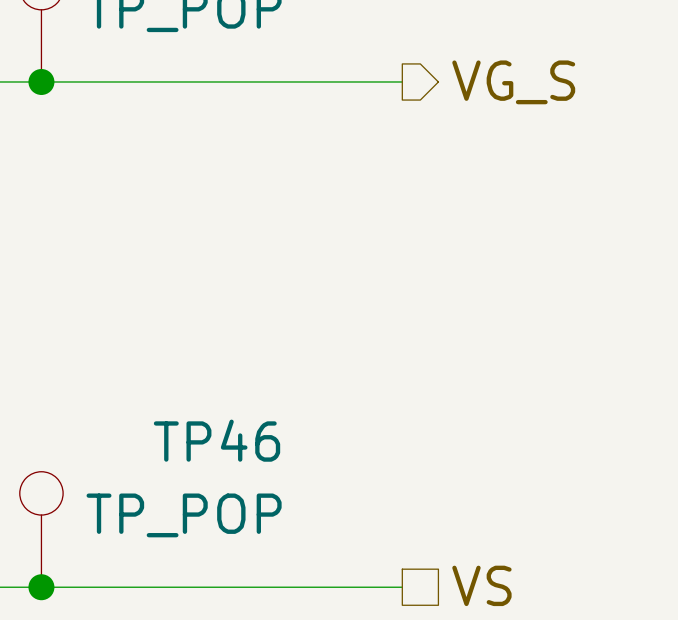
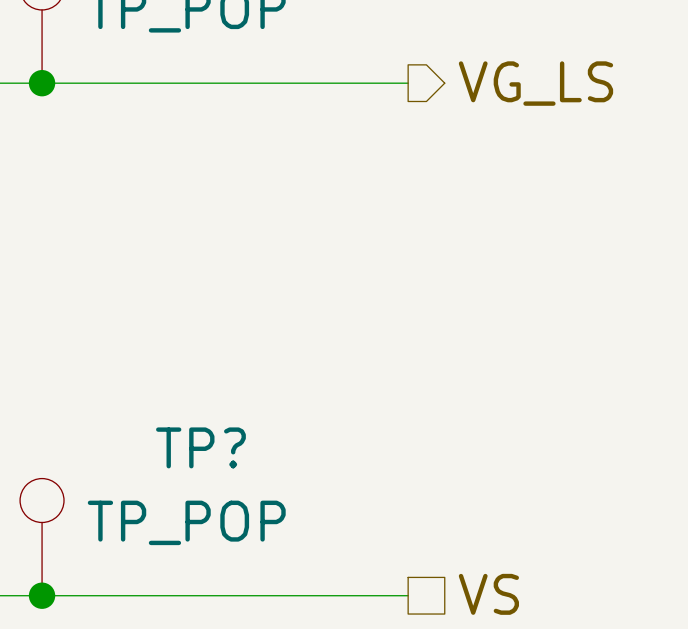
hierarchical label: VG_S (513, 82) -> VG_LS (535, 83)
TP46 name: TP46 (217, 440) -> TP? (200, 447)

